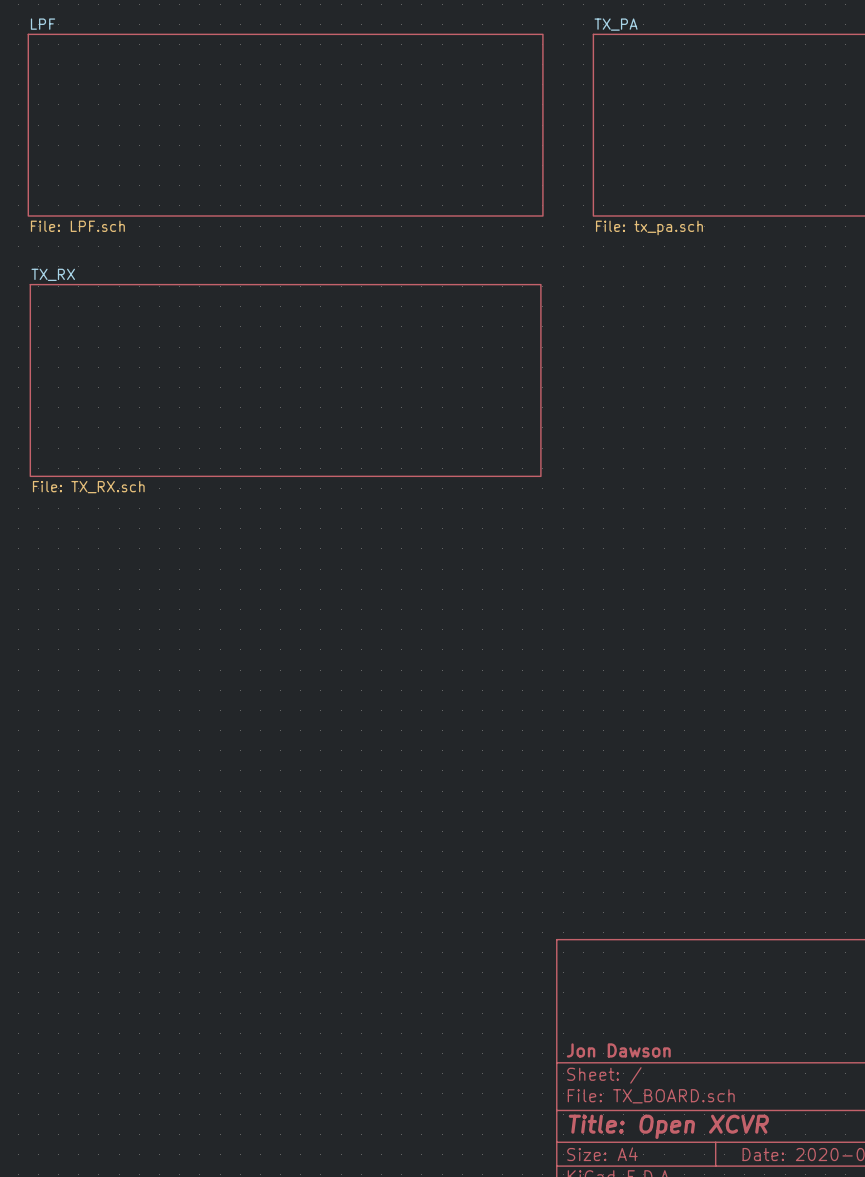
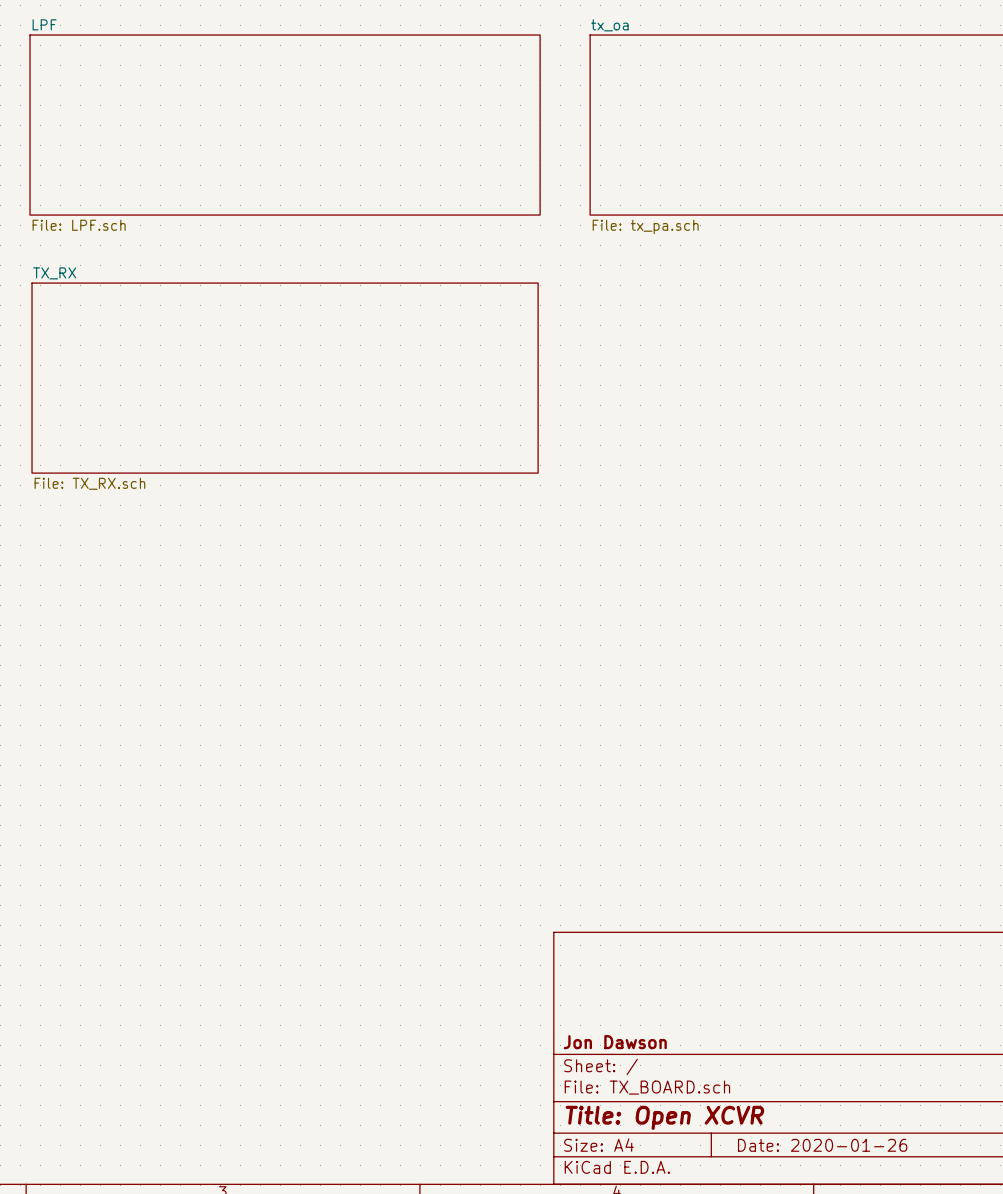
sheet TX_PA name: TX_PA (616, 24) -> tx_oa (609, 25)

